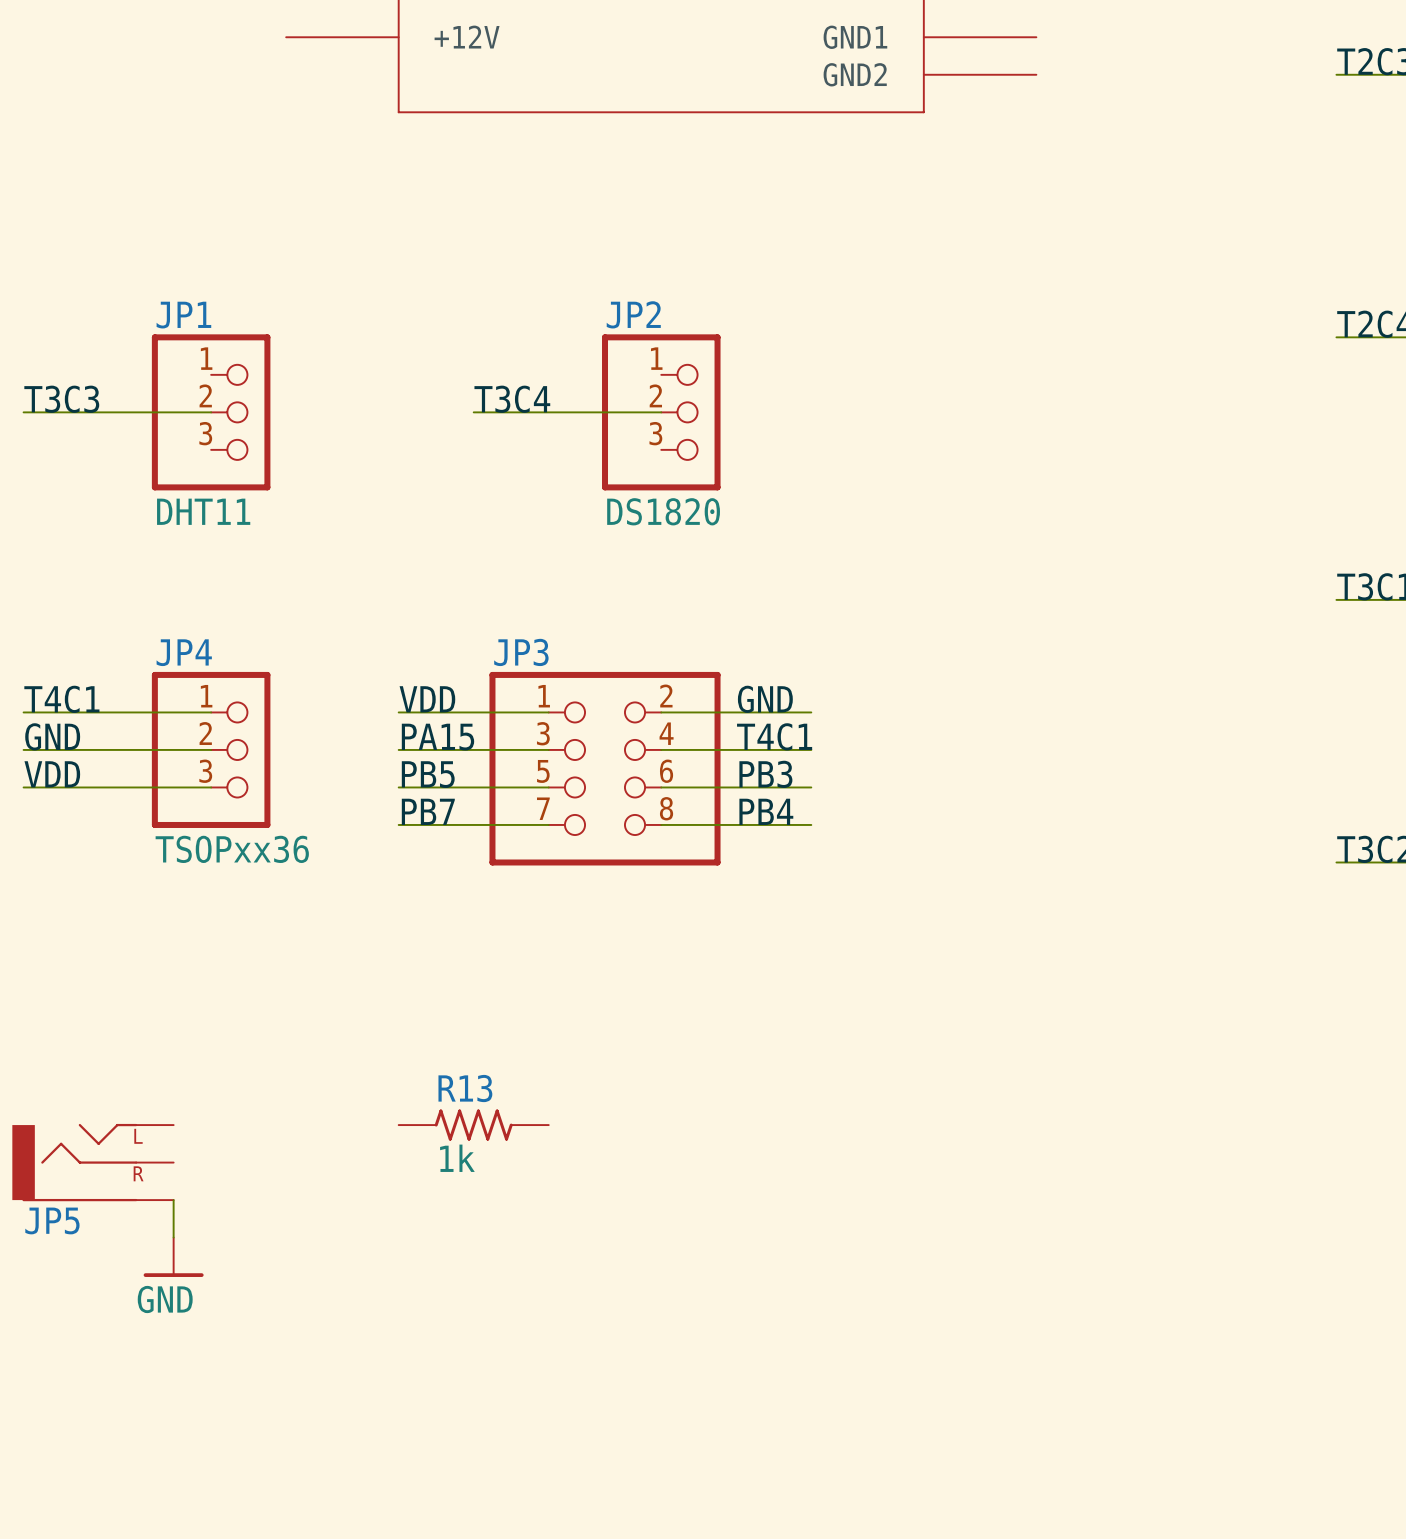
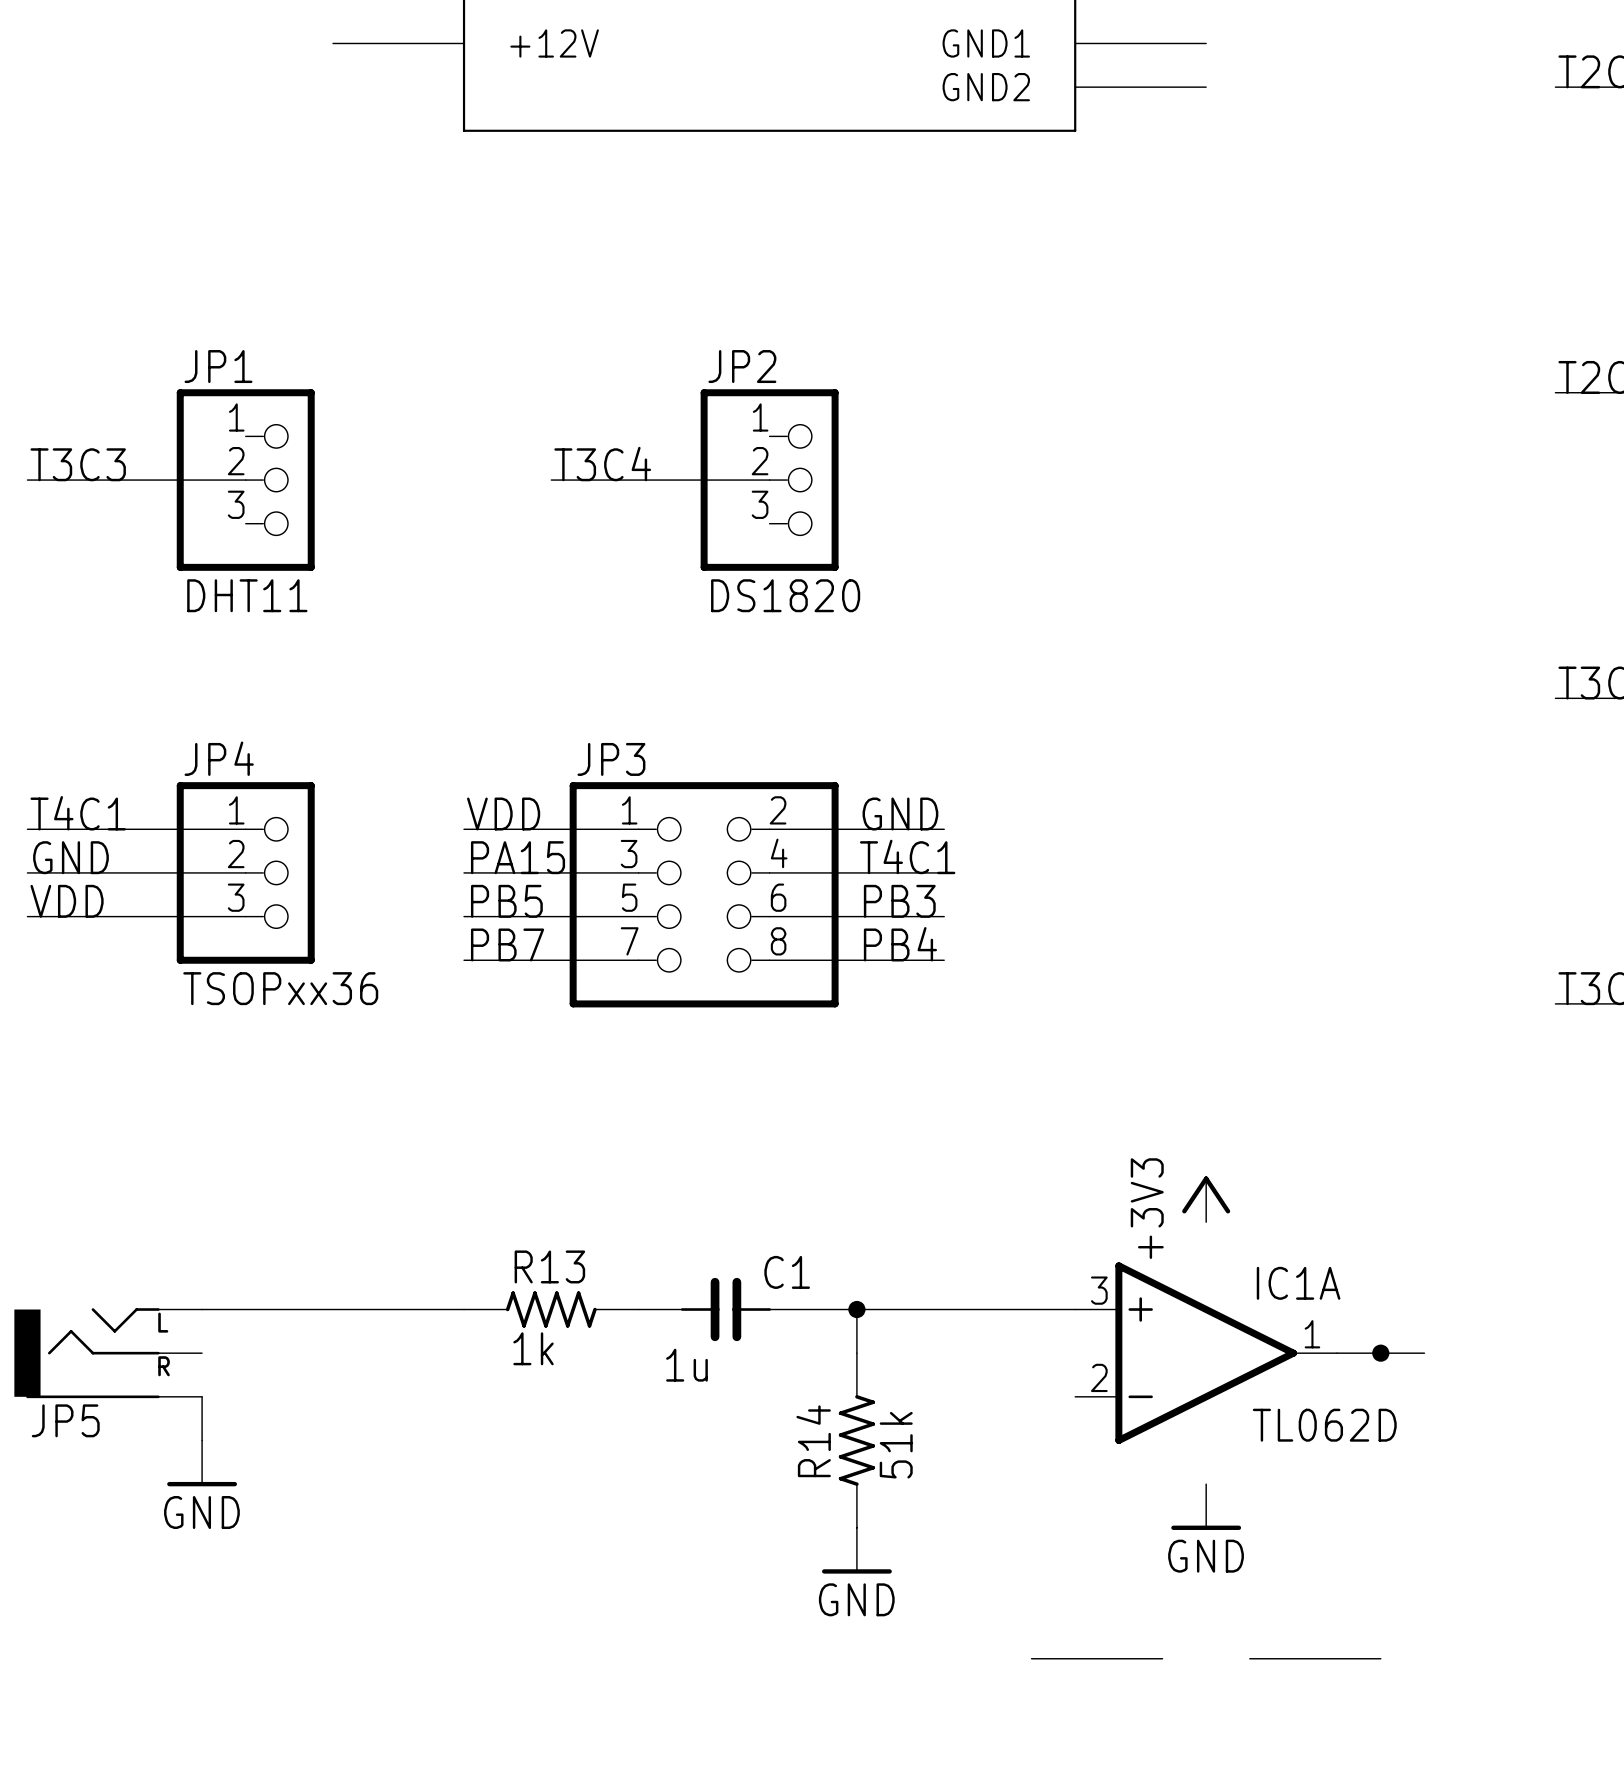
power symbol: none -> +3V3 (1206, 1199)
wire: none -> (202, 1309) (464, 1309)
wire: none -> (638, 1309) (682, 1309)
C1: none -> 1u (725, 1309)
wire: none -> (769, 1309) (1075, 1309)
wire: none -> (856, 1309) (856, 1353)
junction: none -> (856, 1309)
IC1A: none -> TL062D (1206, 1353)
wire: none -> (1337, 1353) (1424, 1353)
junction: none -> (1380, 1353)
R14: none -> 51k (856, 1440)
power symbol: none -> GND (1206, 1507)
power symbol: none -> GND (856, 1550)
wire: none -> (1031, 1658) (1162, 1658)
wire: none -> (1249, 1658) (1380, 1658)

